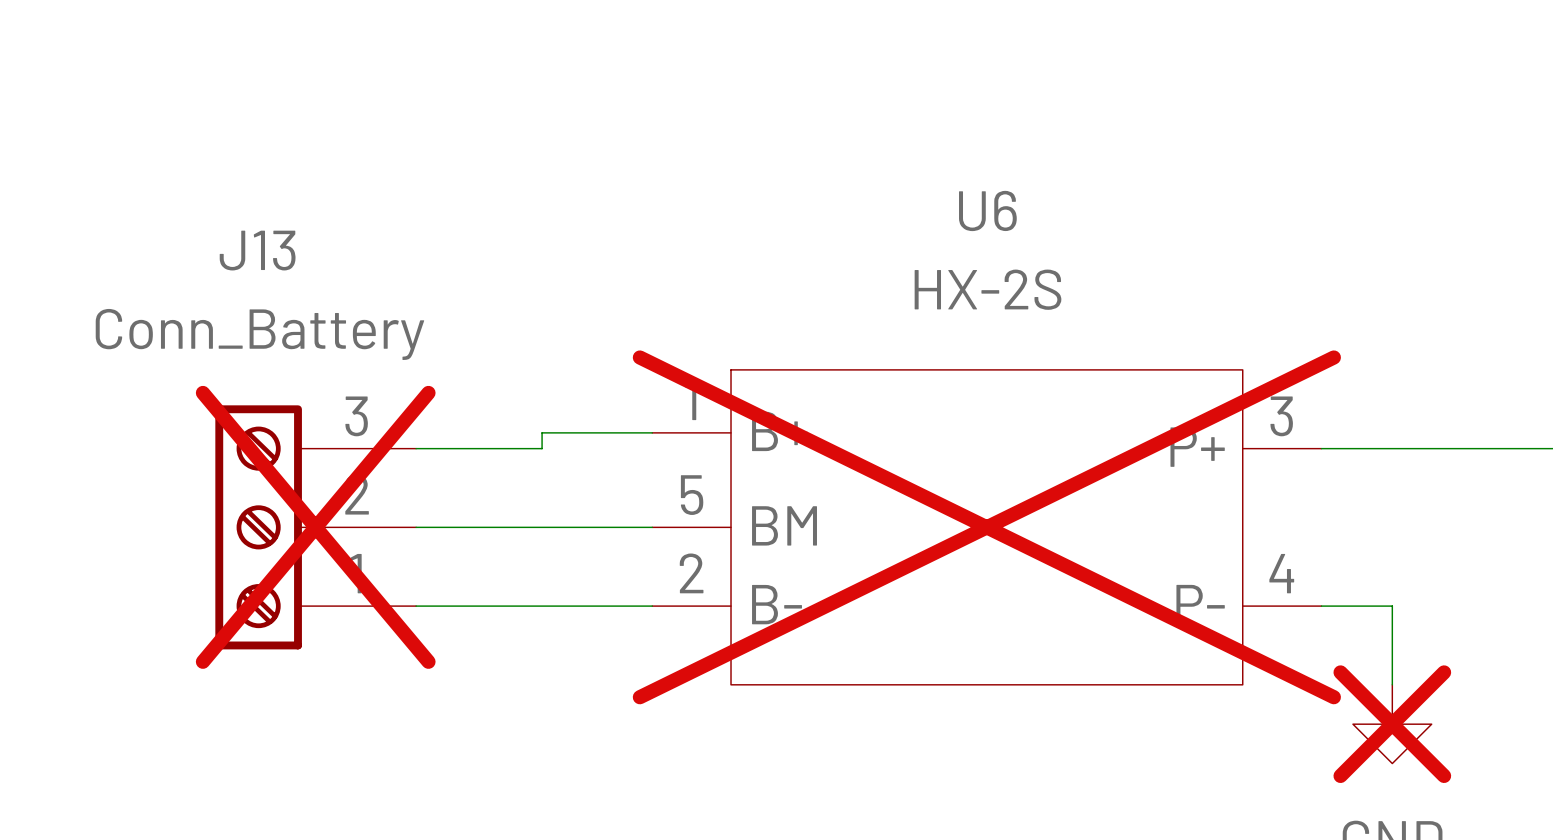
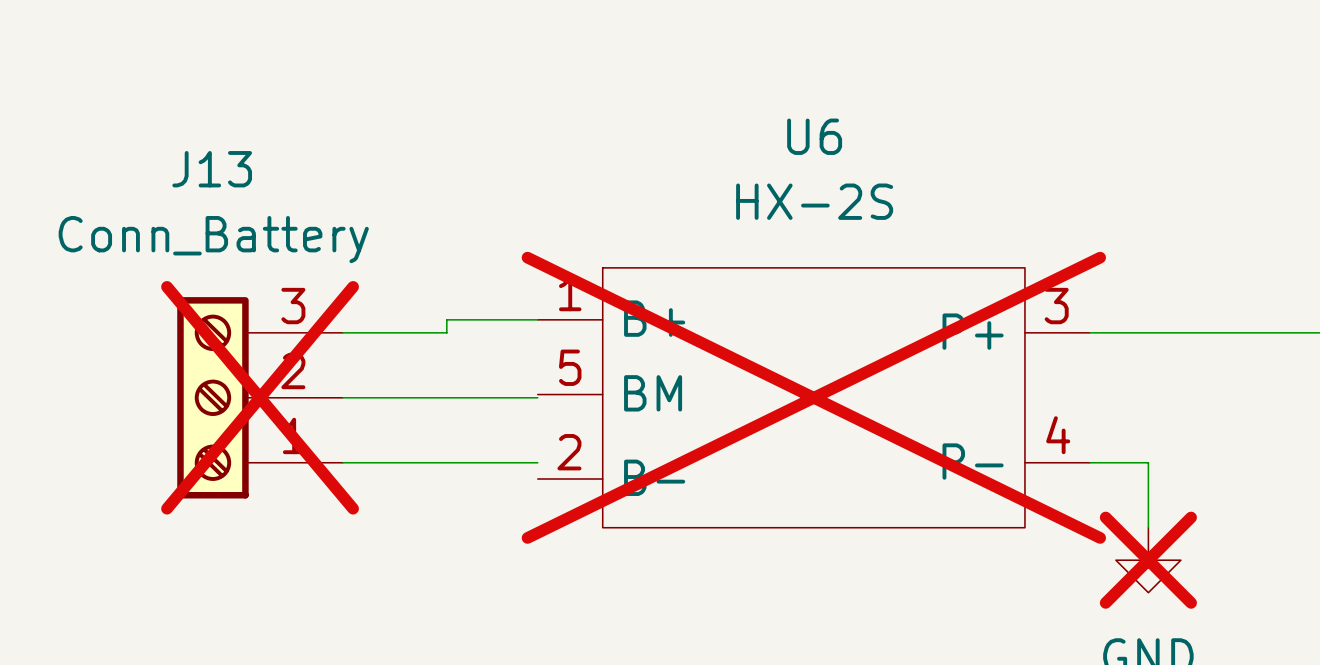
U6 symbol: [652, 369, 1322, 685] -> [537, 267, 1090, 528]

